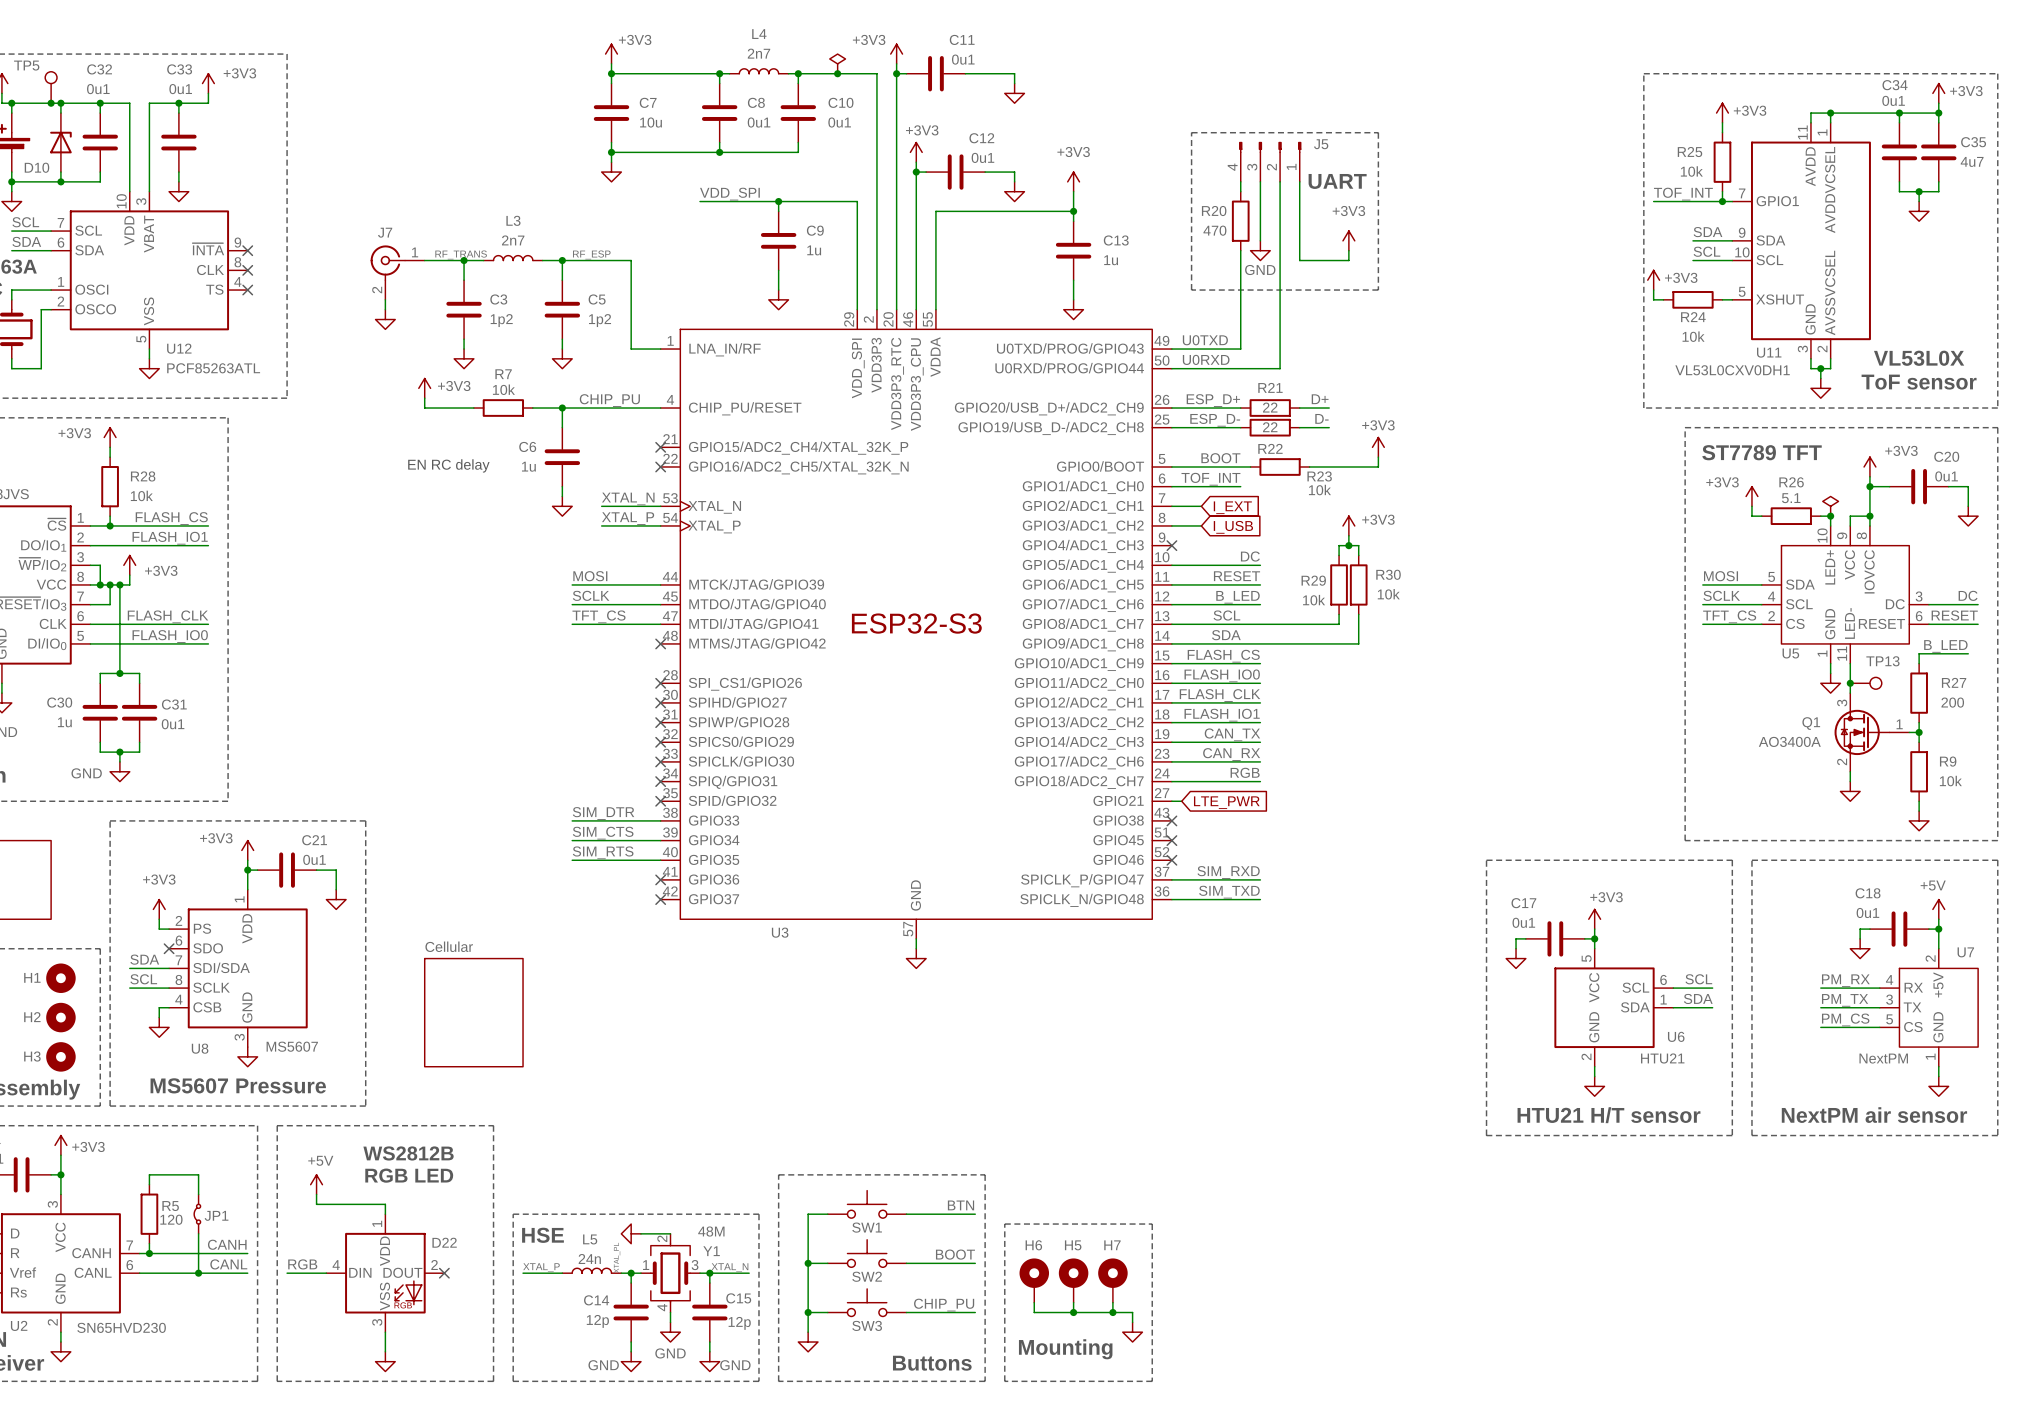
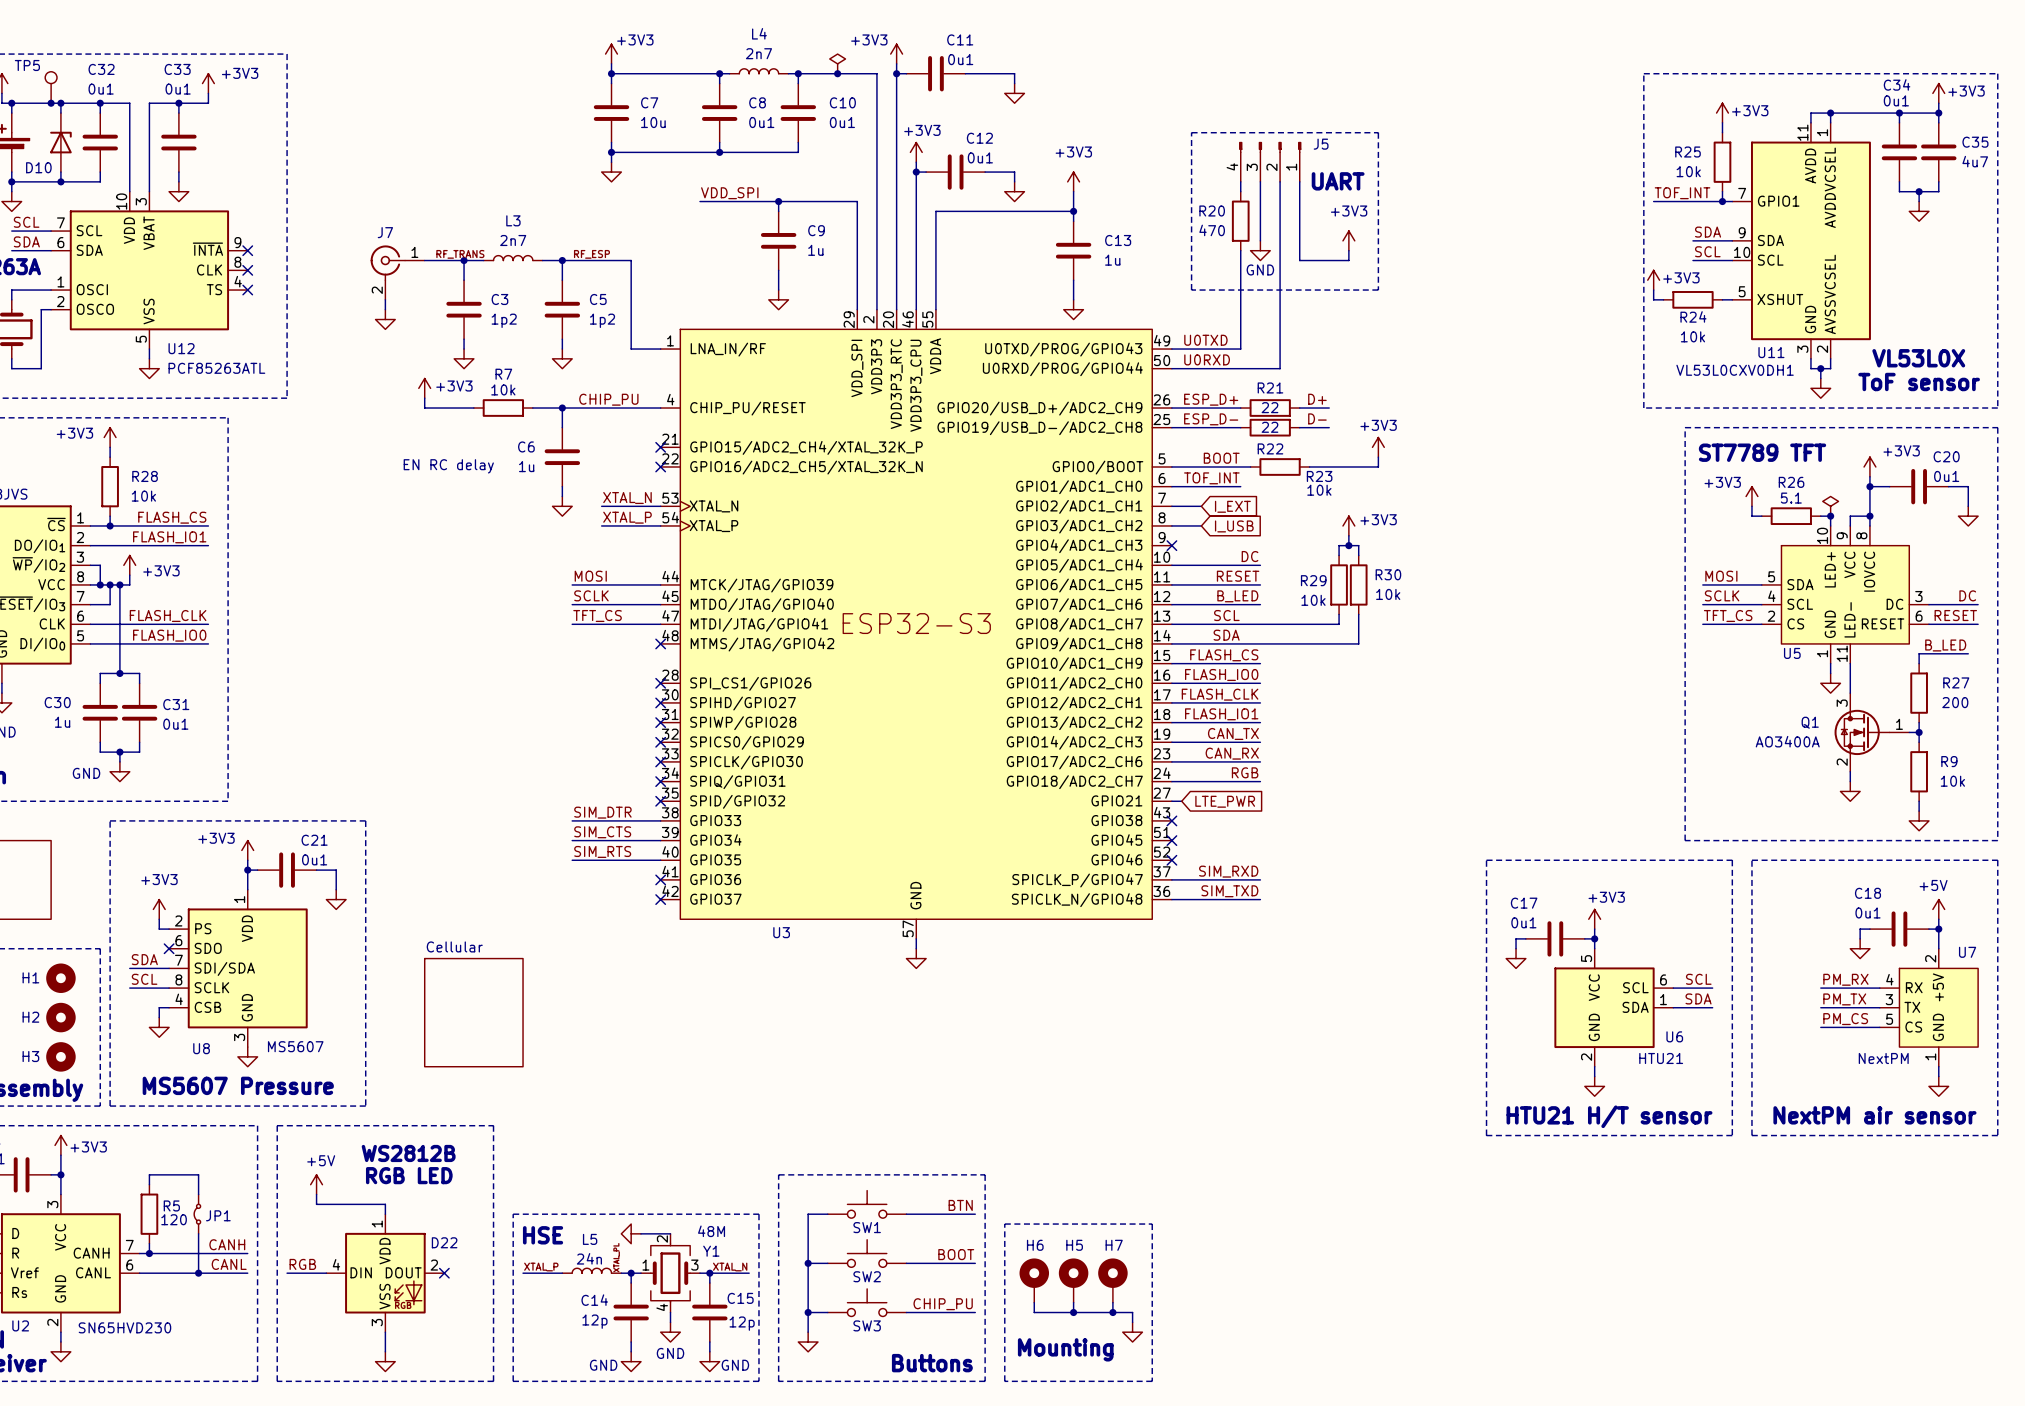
junction: (1850, 683) -> none
TP13: (1866, 683) -> none

